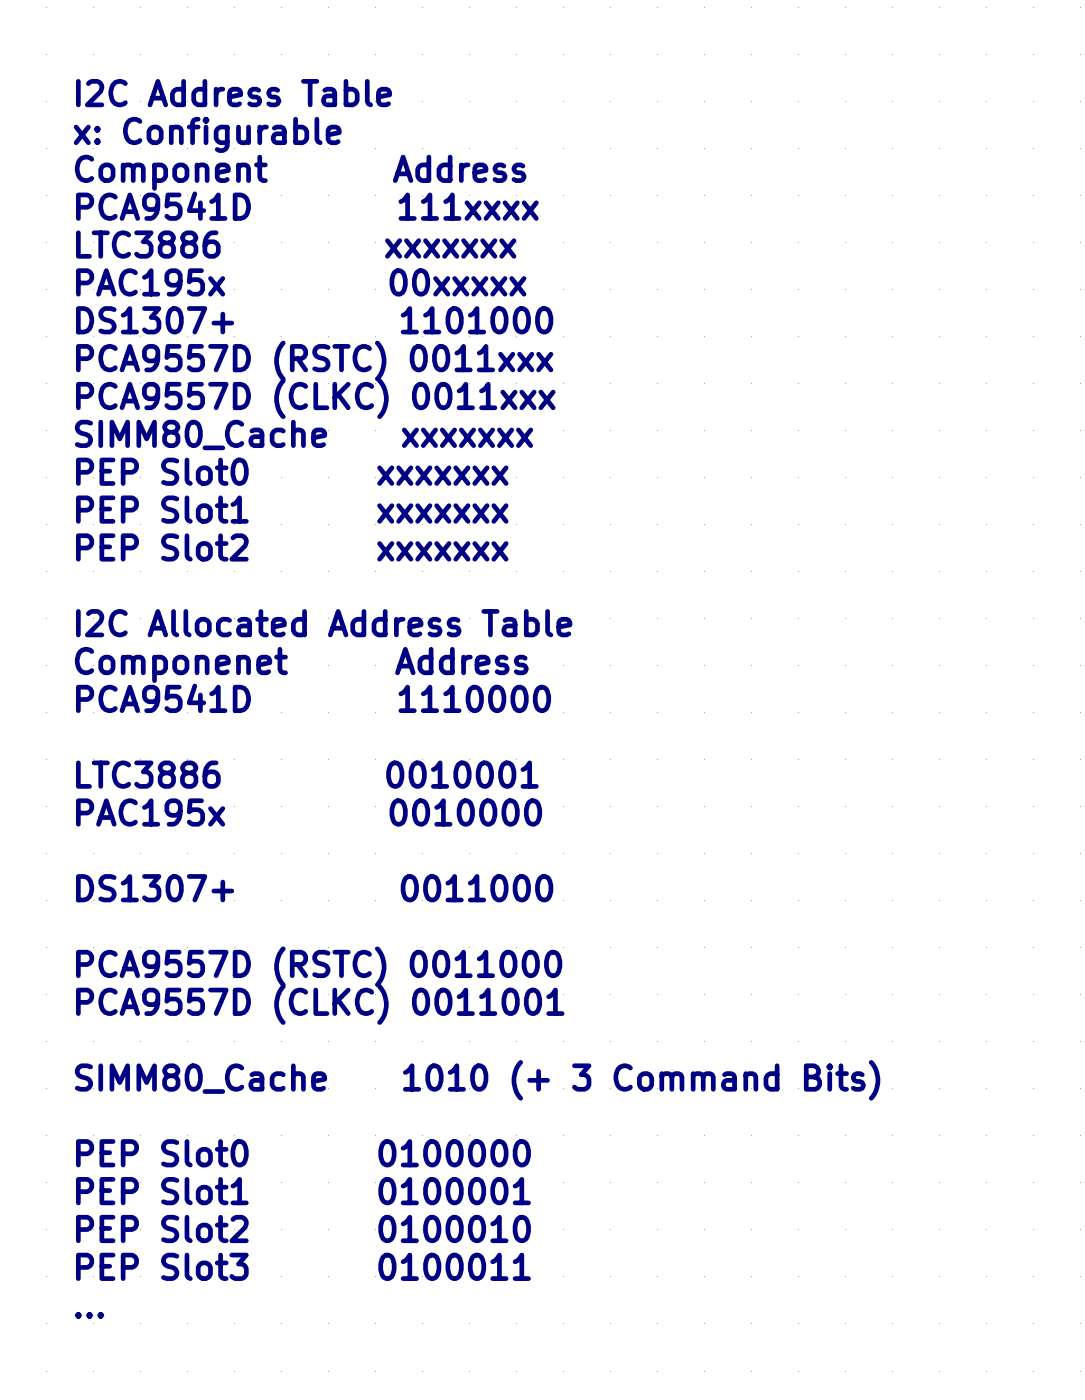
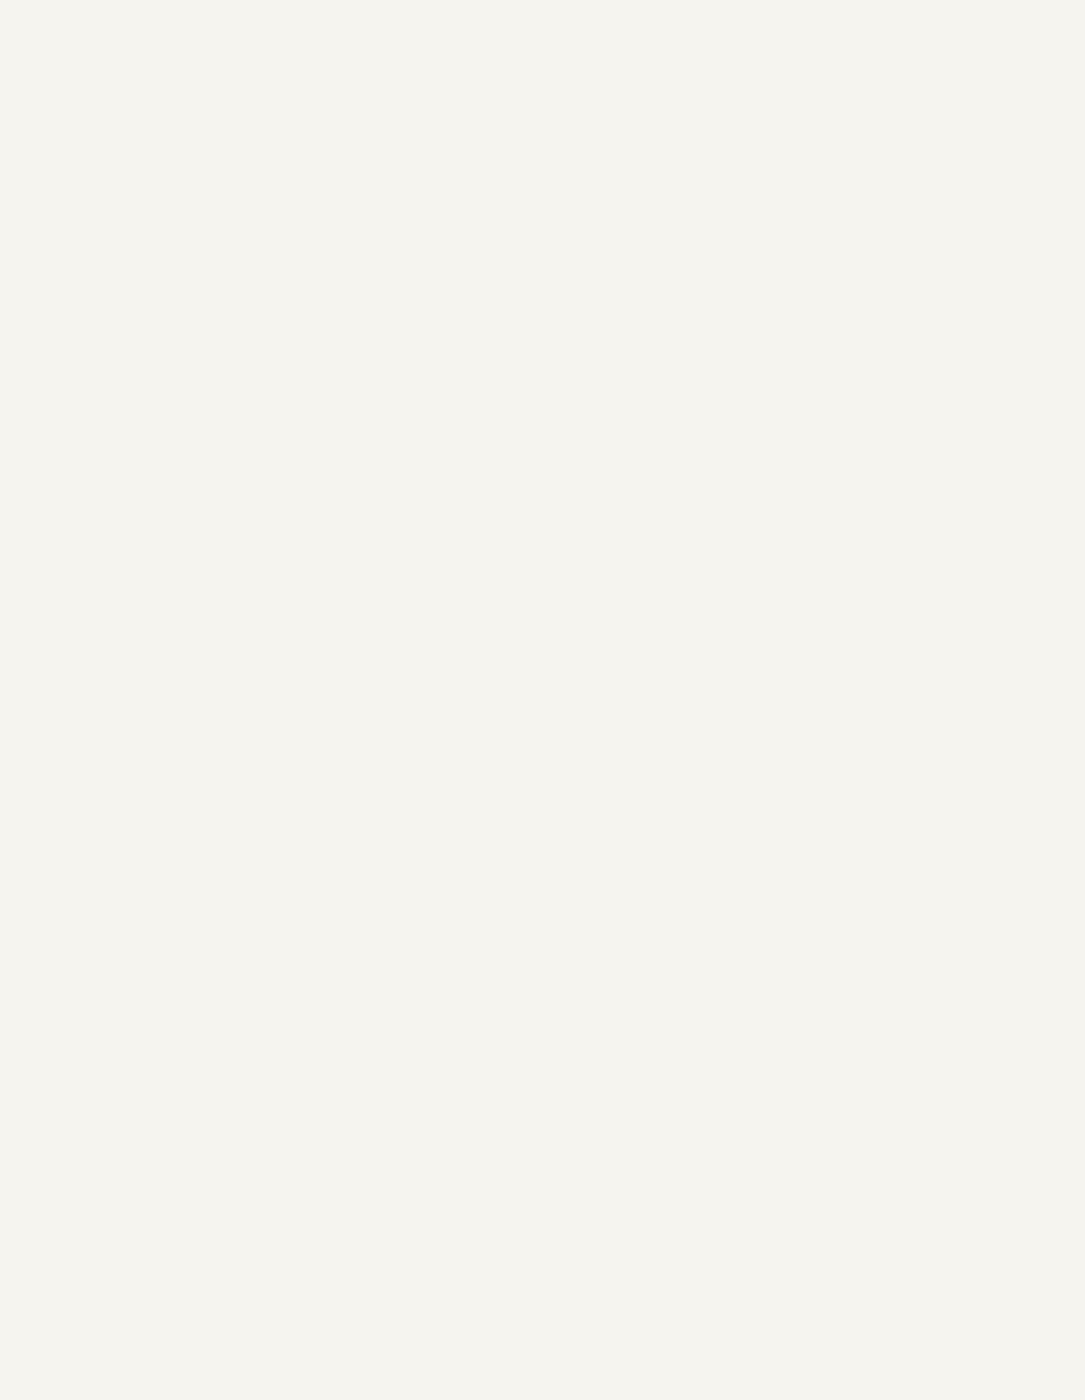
text: I2C Address Table (234, 93) -> none
text: x: Configurable (207, 134) -> none
text: Component Address (300, 172) -> none
text: PCA9541D 111xxxx (307, 206) -> none
text: LTC3886 xxxxxxx (296, 244) -> none
text: PAC195x 00xxxxx (301, 282) -> none
text: DS1307+ 1101000 (314, 320) -> none
text: PCA9557D (RSTC) 0011xxx (314, 360) -> none
text: PCA9557D (CLKC) 0011xxx (315, 398) -> none
text: SIMM80_Cache xxxxxxx (303, 434) -> none
text: PEP Slot0 xxxxxxx (292, 471) -> none
text: PEP Slot1 xxxxxxx (292, 509) -> none
text: PEP Slot2 xxxxxxx (292, 547) -> none
text: I2C Allocated Address Table (324, 623) -> none
text: Componenet Address (301, 664) -> none
text: PCA9541D 1110000 (313, 698) -> none
text: LTC3886 0010001 (307, 774) -> none
text: PAC195x 0010000 (309, 812) -> none
text: DS1307+ 0011000 (314, 888) -> none
text: PCA9557D (RSTC) 0011000 (319, 966) -> none
text: PCA9557D (CLKC) 0011001 (320, 1004) -> none
text: SIMM80_Cache 1010 (+ 3 Command Bits) (477, 1080) -> none
text: PEP Slot0 0100000 (303, 1153) -> none
text: PEP Slot1 0100001 (303, 1191) -> none
text: PEP Slot2 0100010 (303, 1228) -> none
text: PEP Slot3 0100011 (303, 1266) -> none
text: ... (89, 1315) -> none

